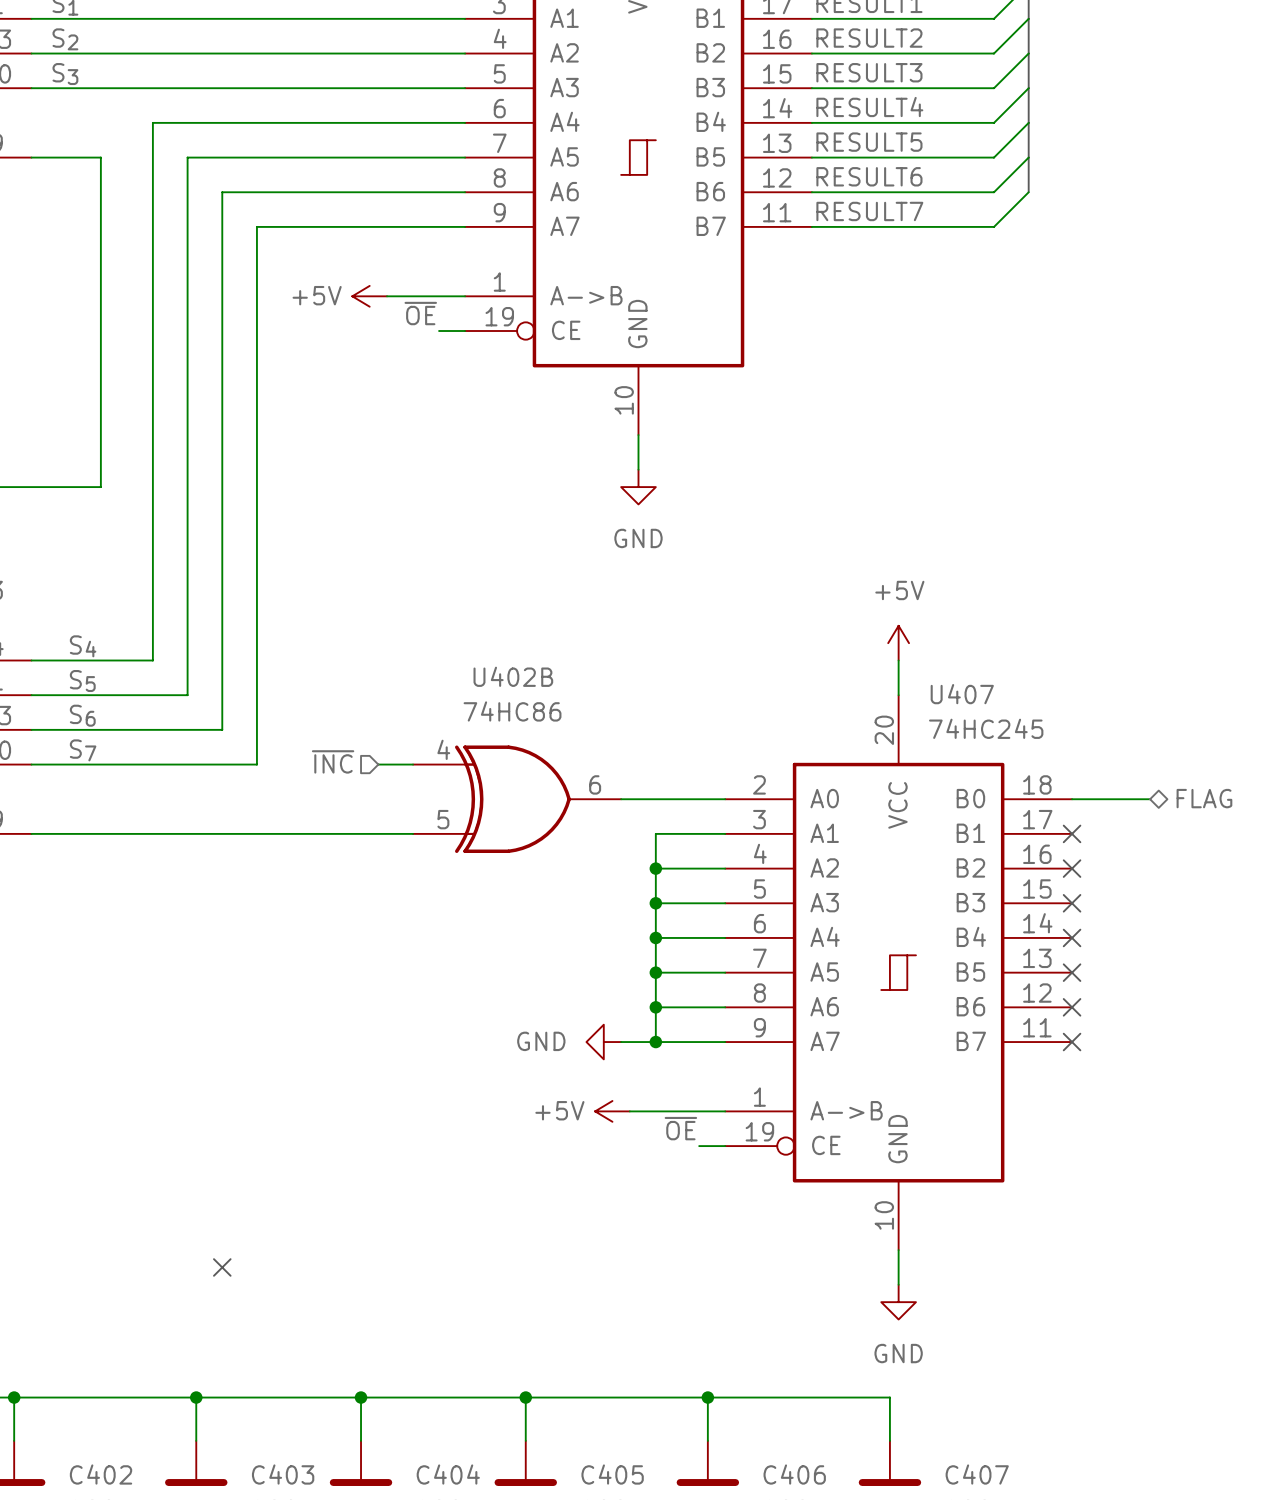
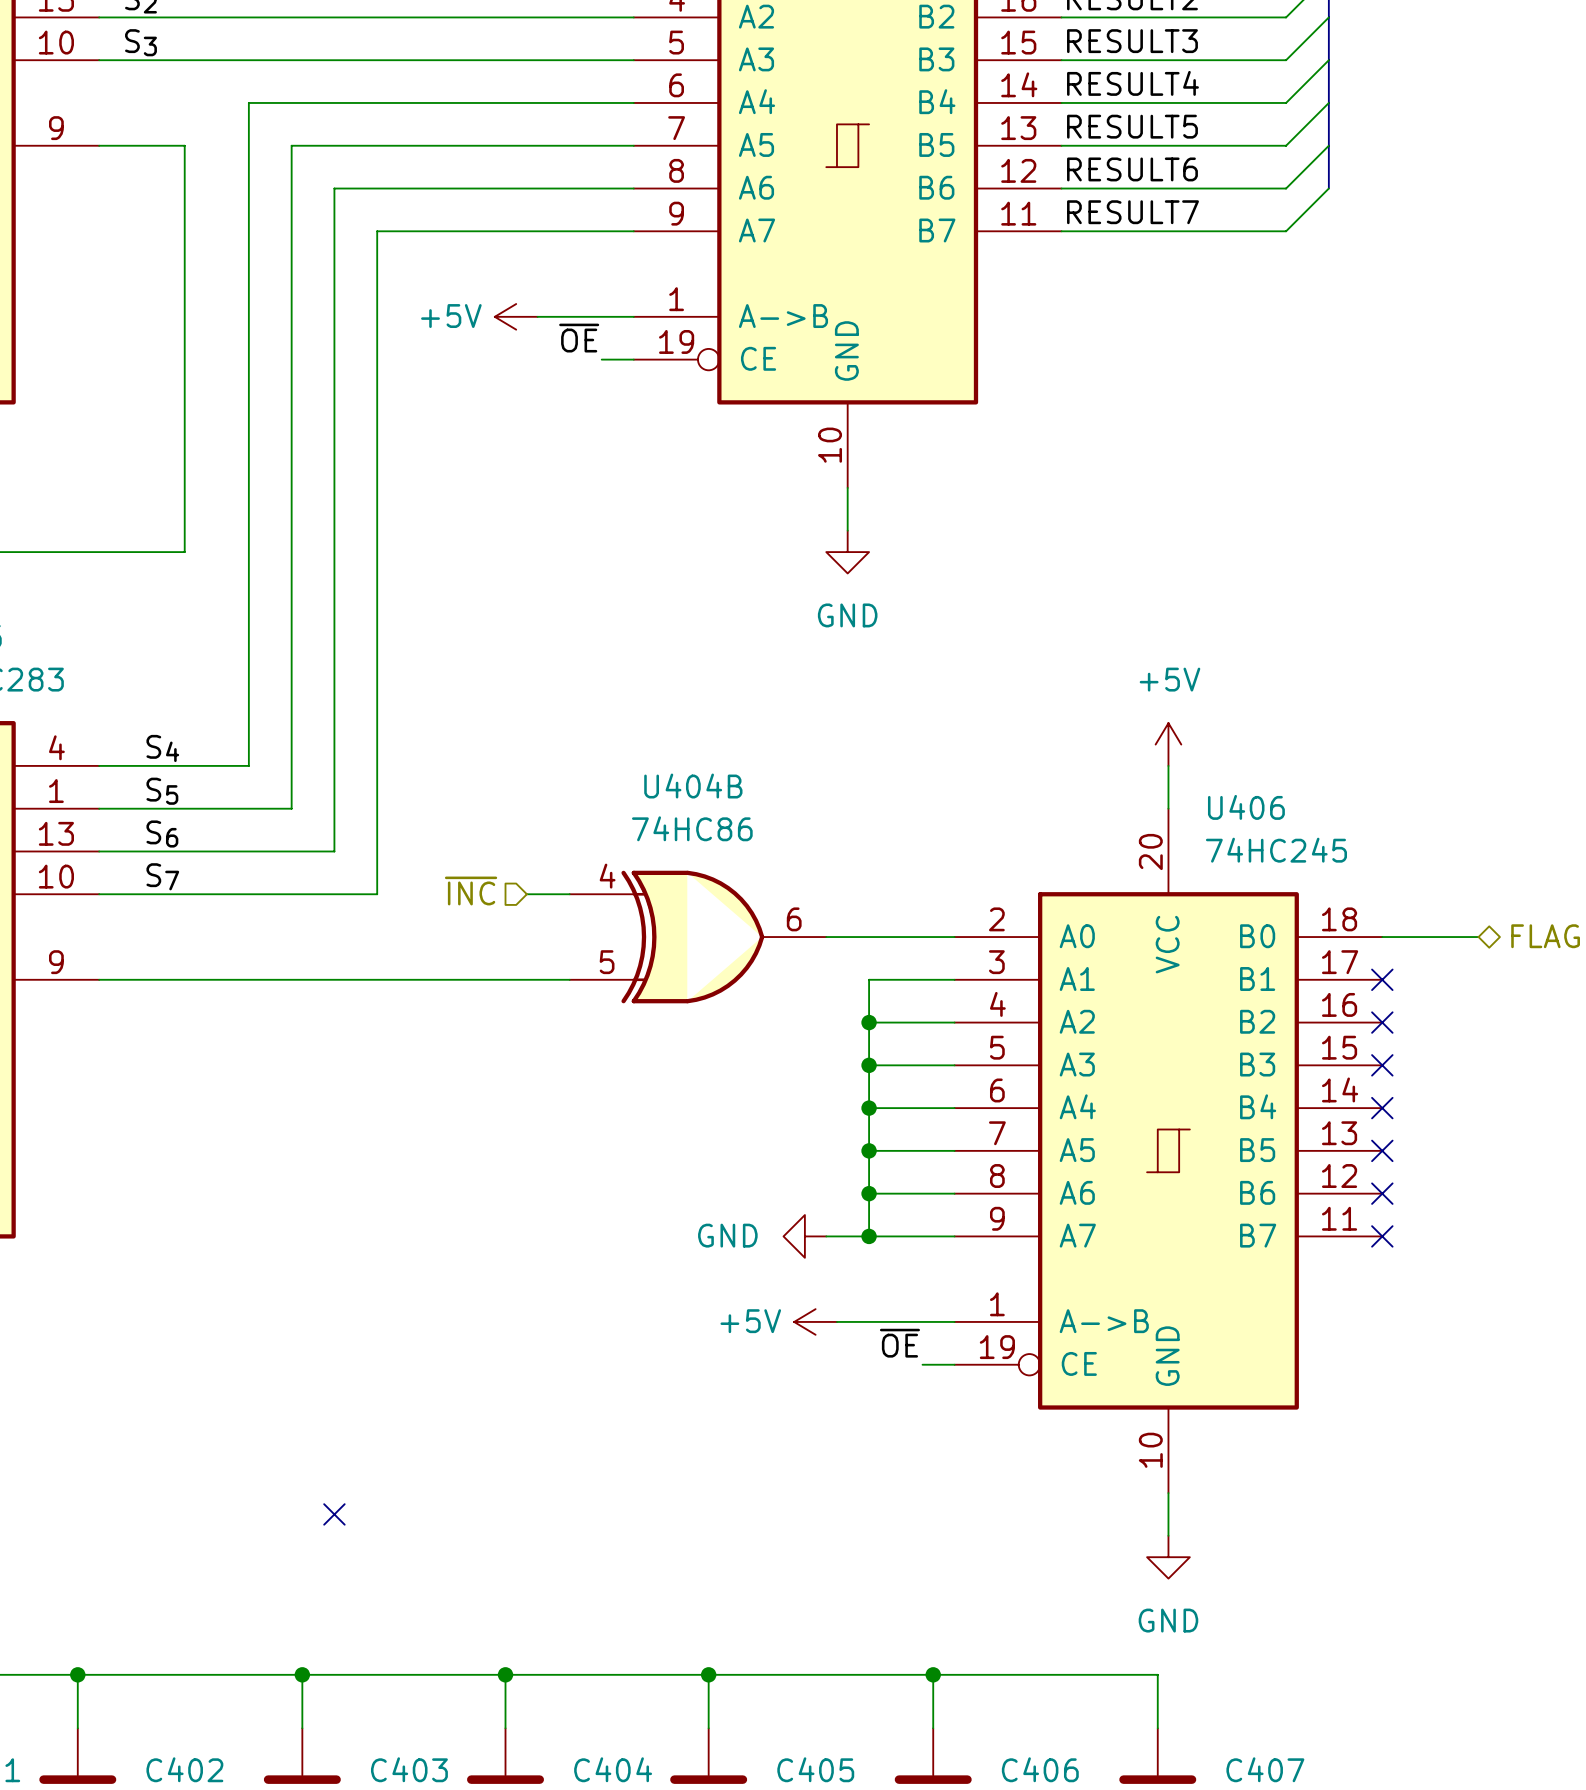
U402B name: U402B (513, 676) -> U404B (693, 786)
U407 name: U407 (962, 694) -> U406 (1246, 807)

